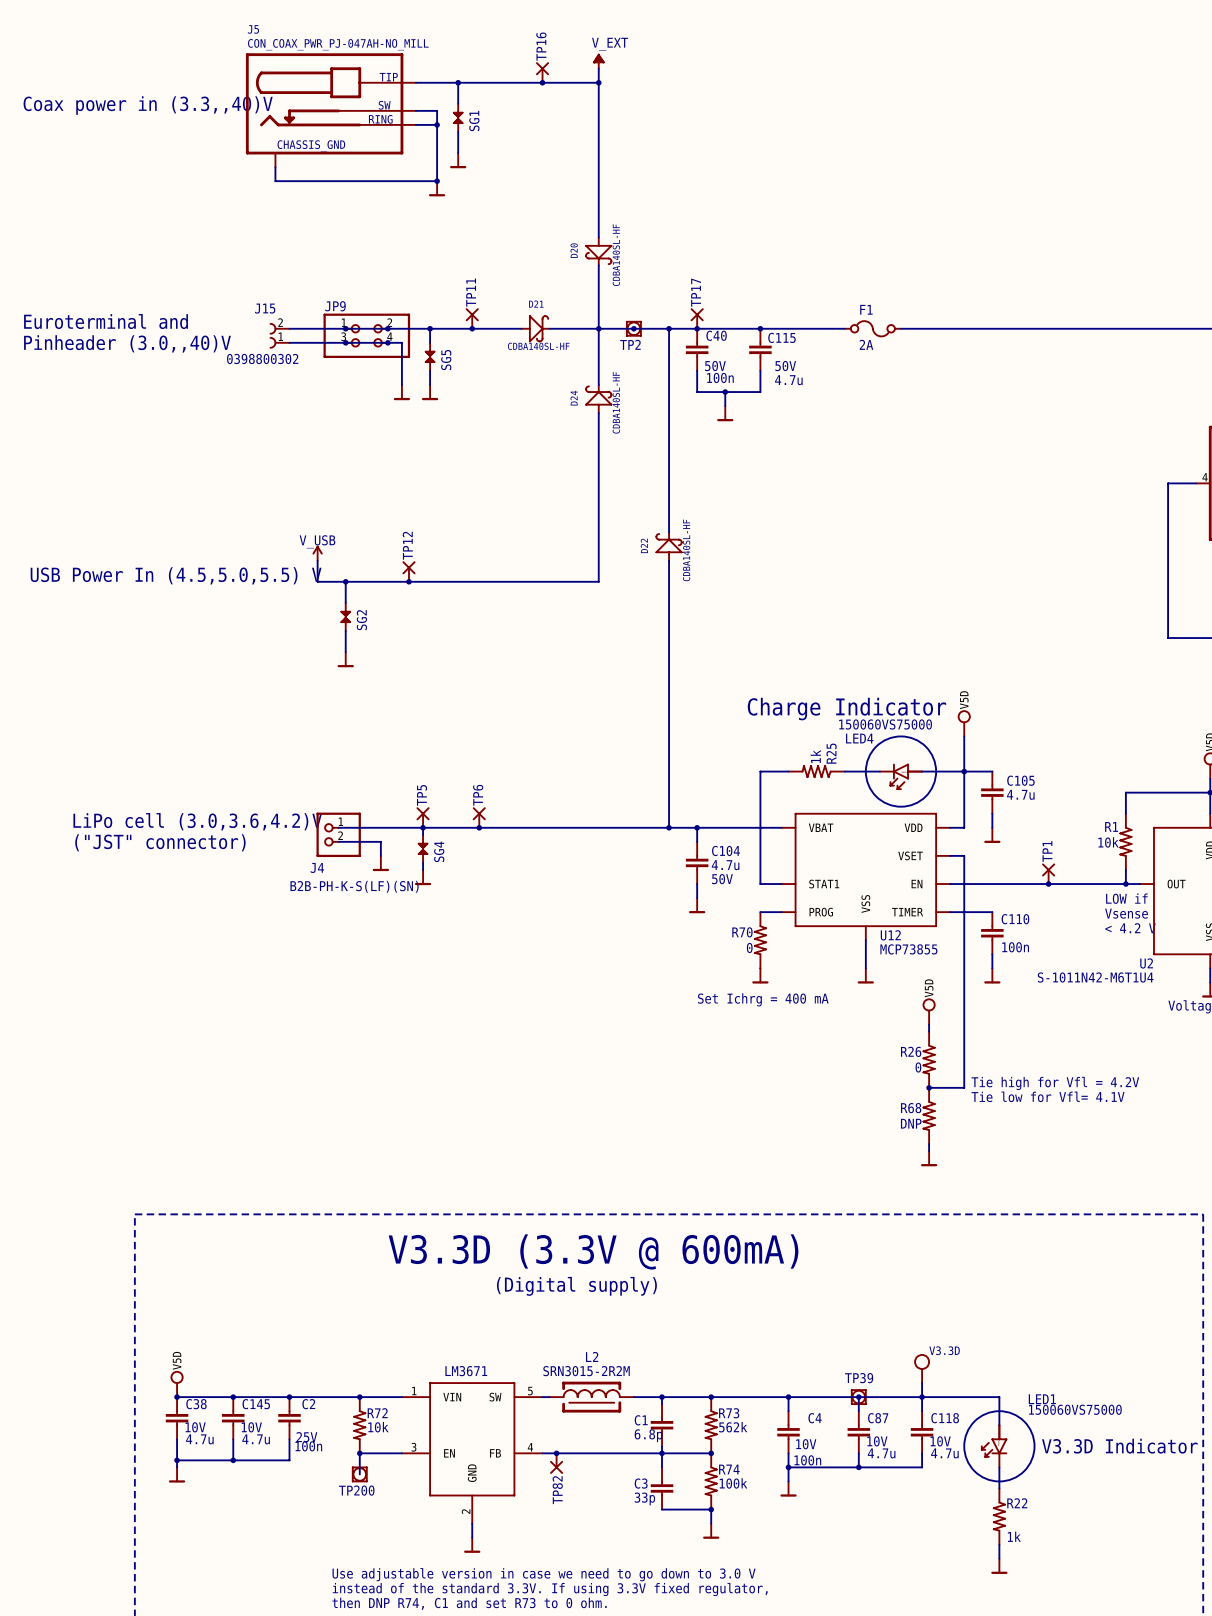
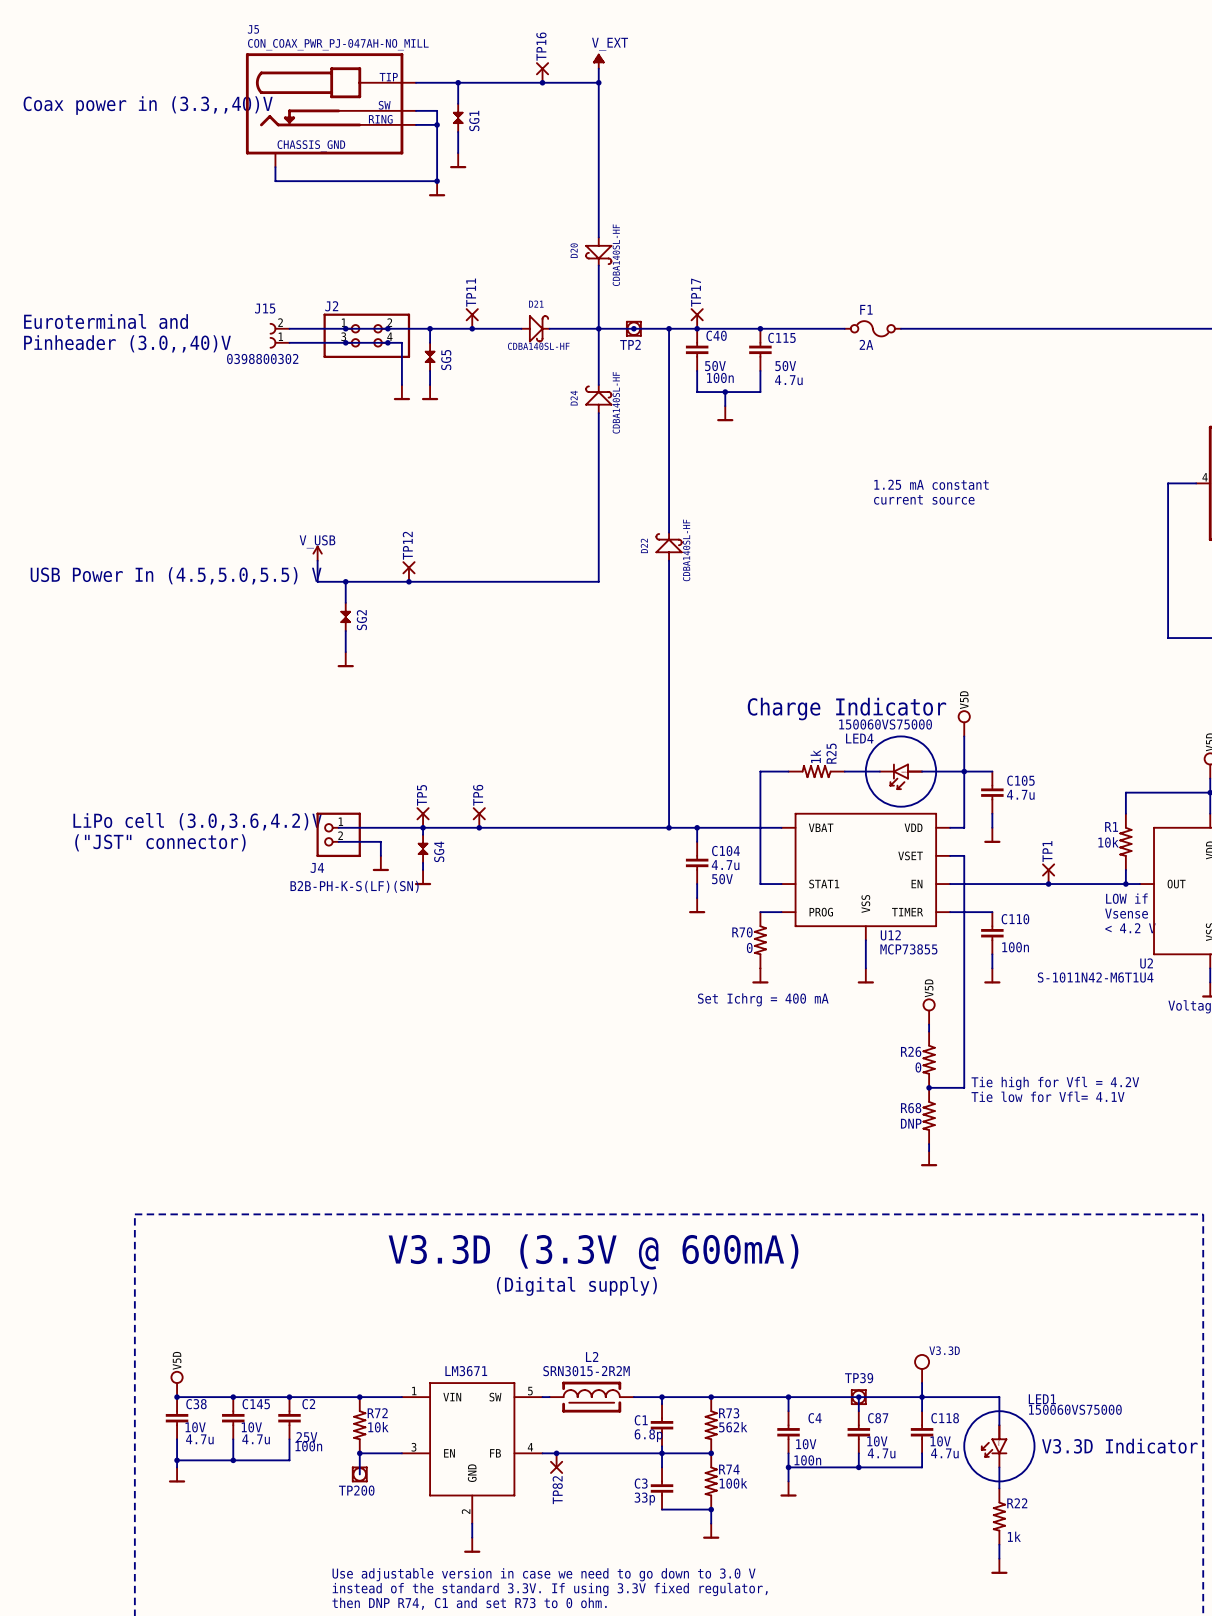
JP9 name: JP9 (335, 306) -> J2 (331, 306)
text: none -> 1.25 mA constant (931, 484)
text: none -> current source (924, 499)

